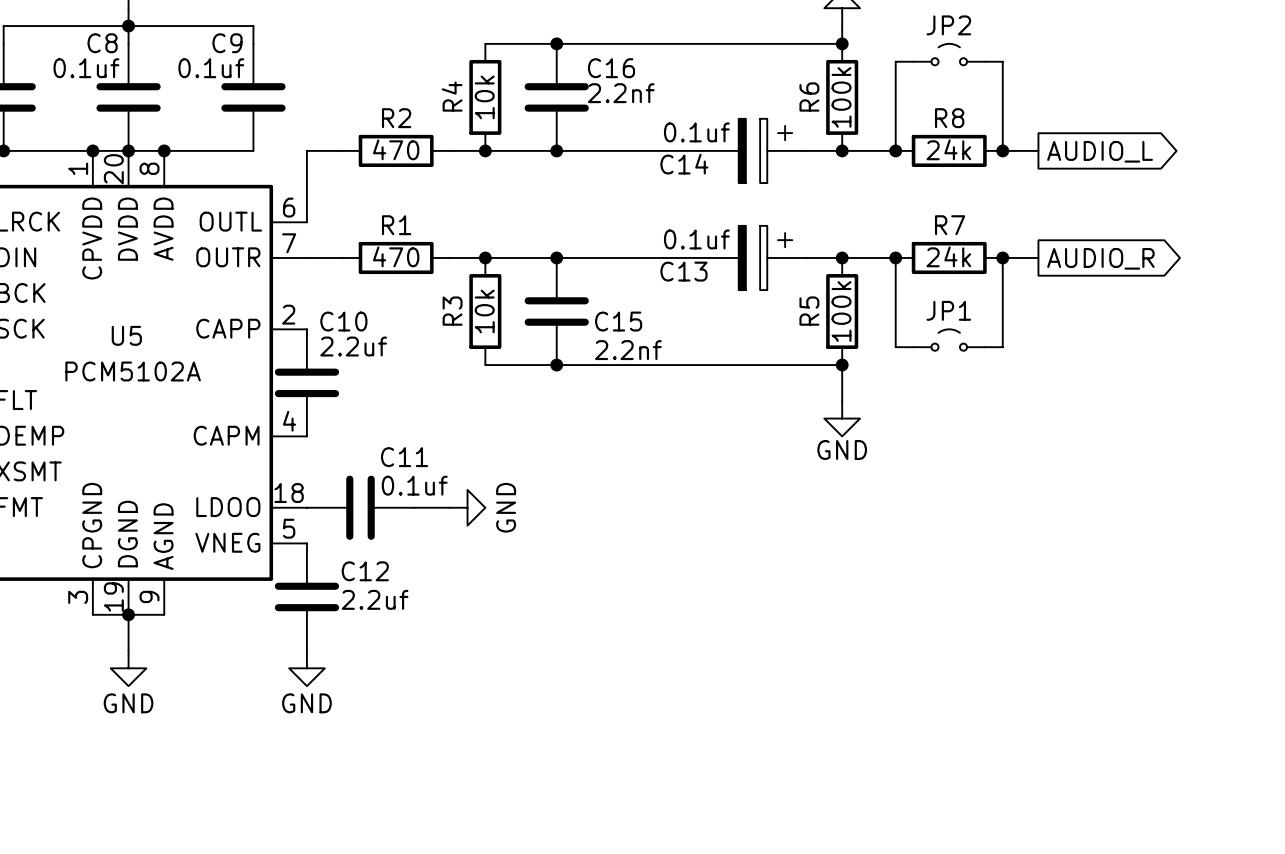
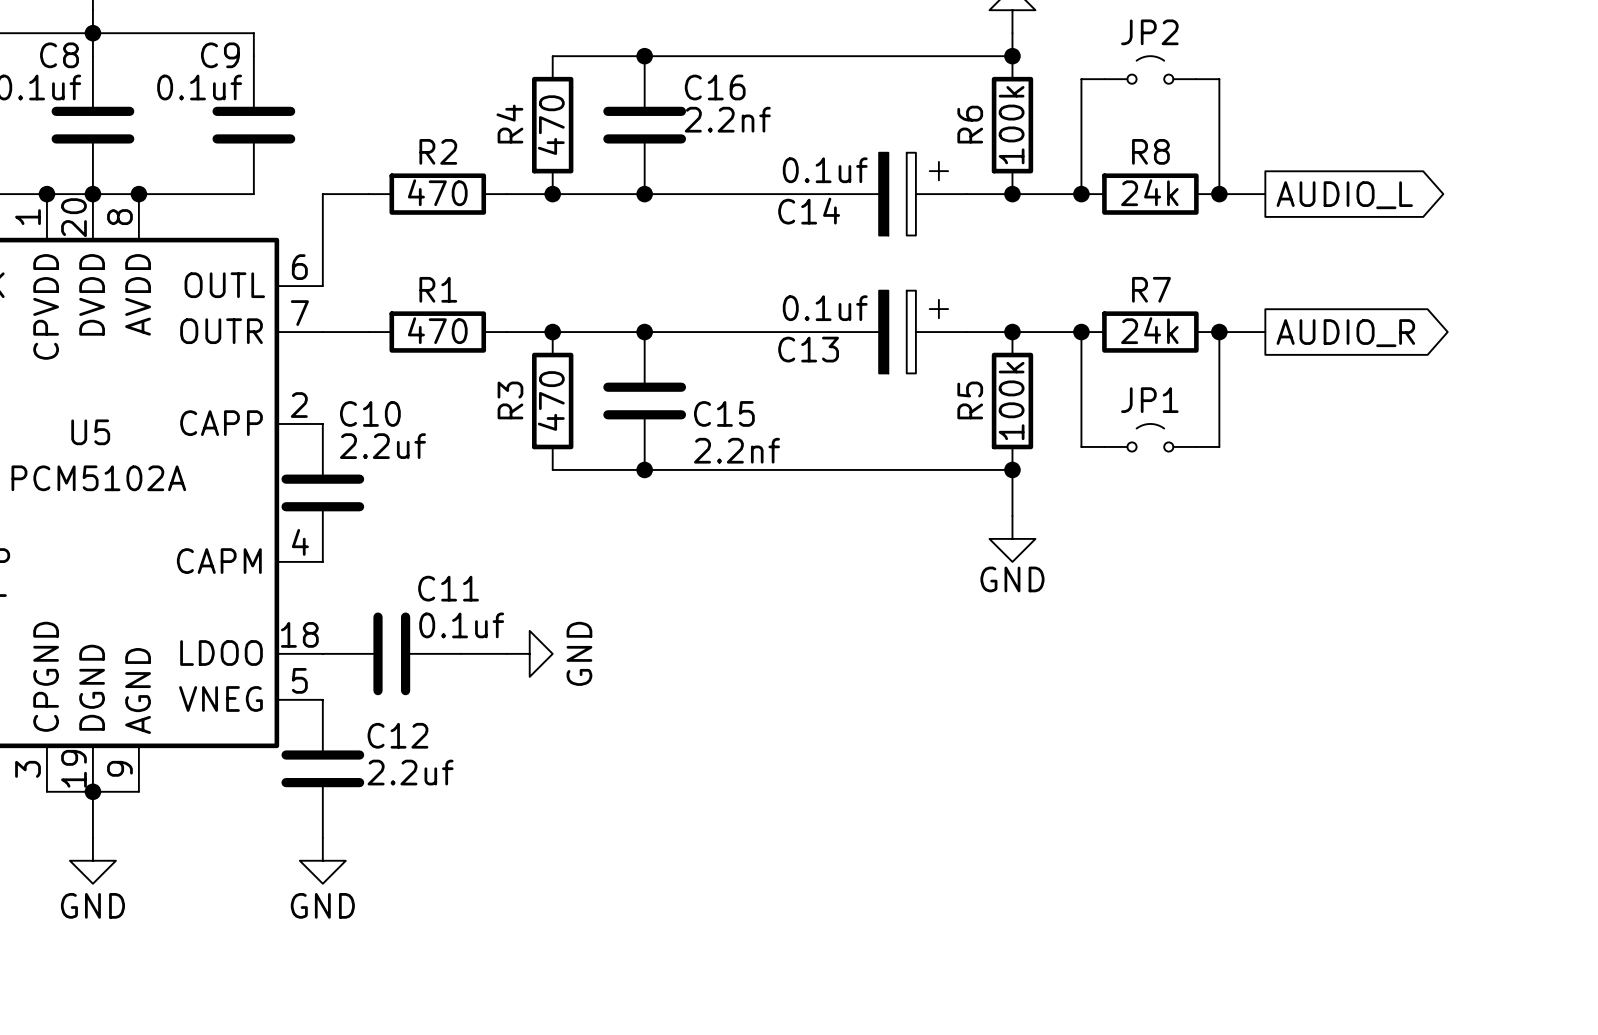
R4 value: 10k (484, 97) -> 470 (551, 125)
R3 value: 10k (484, 311) -> 470 (551, 401)

